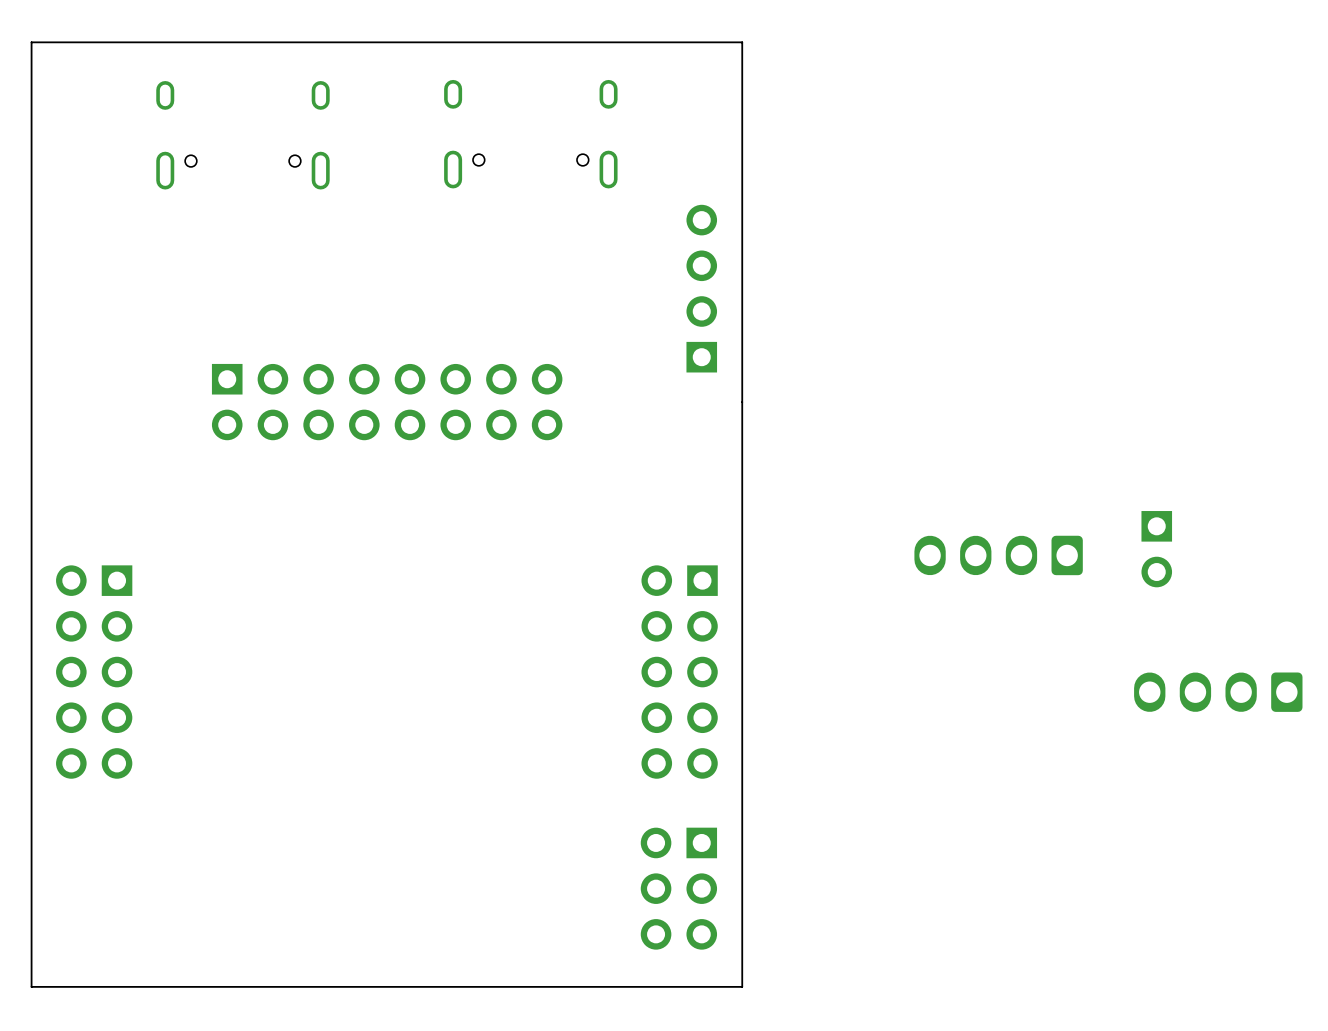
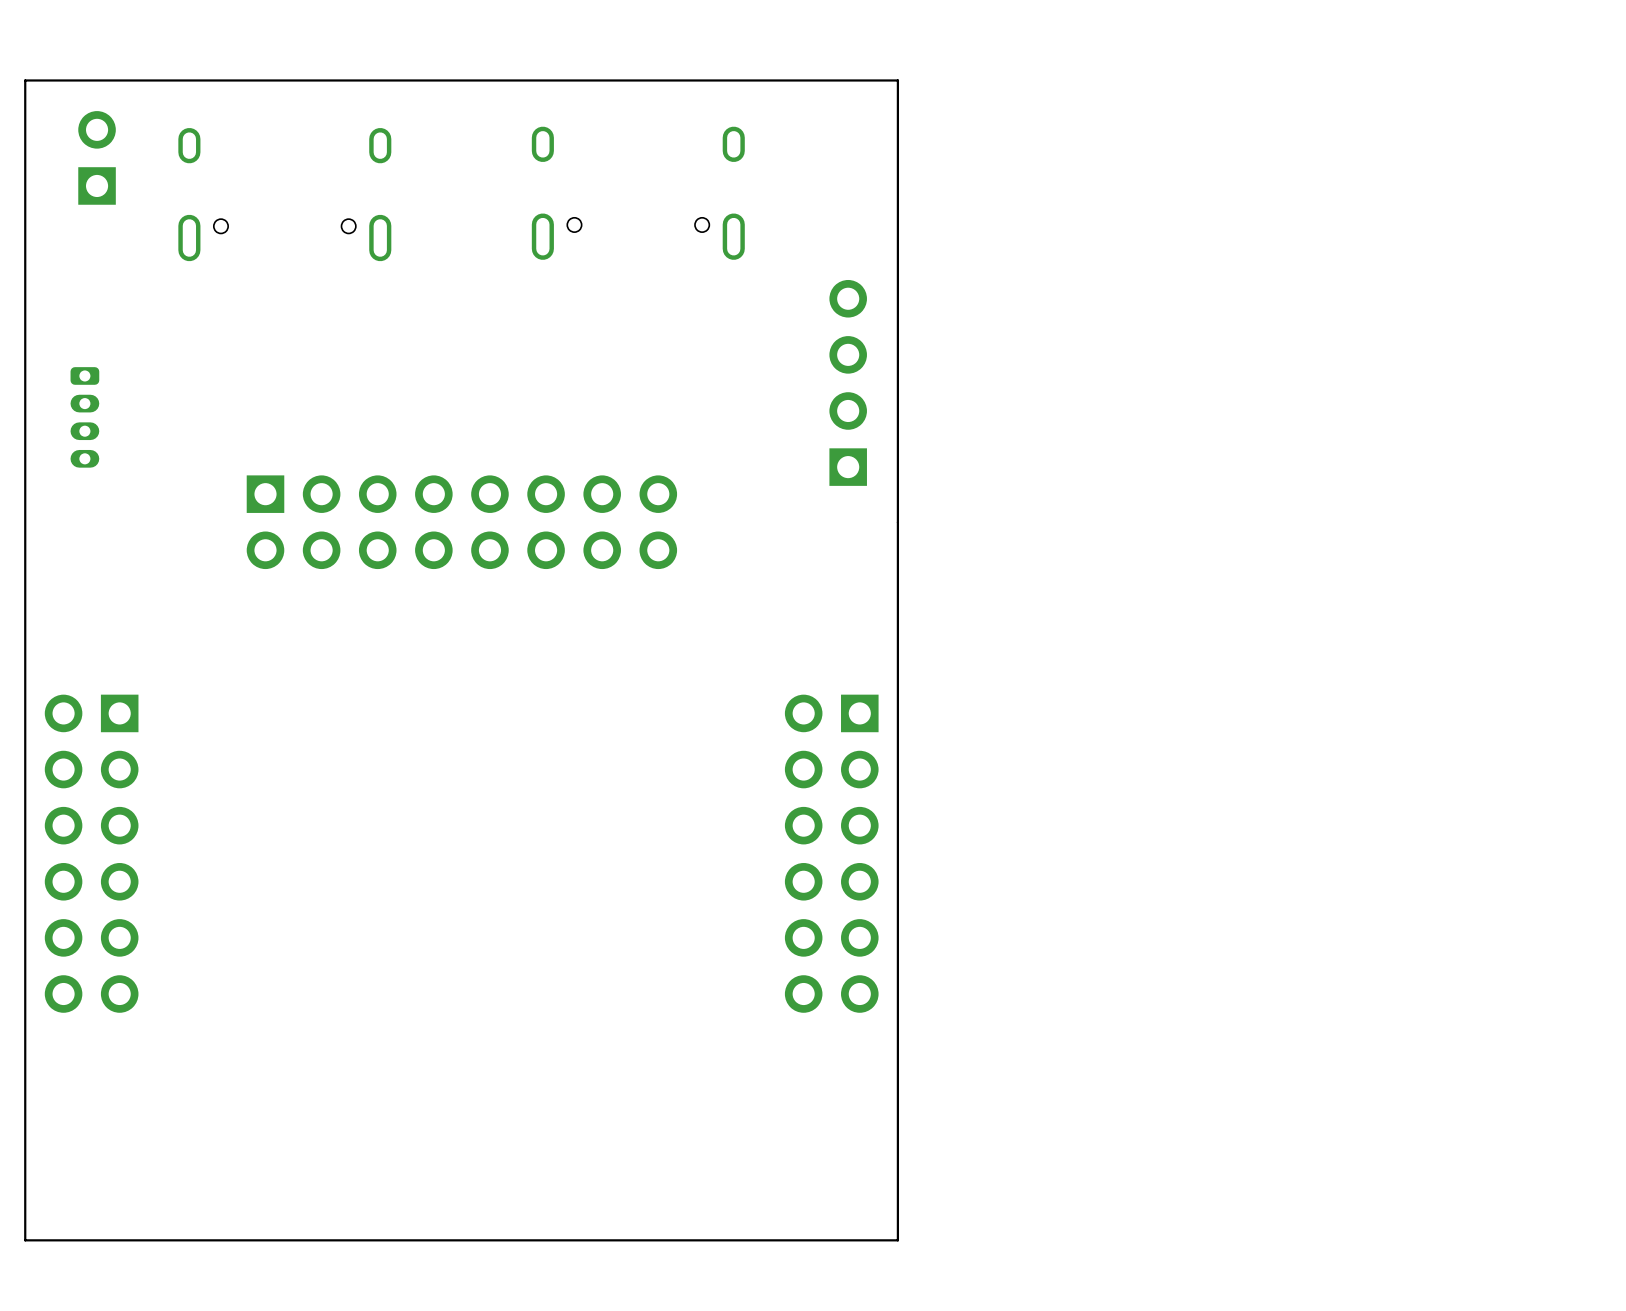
part: none -> (97, 157)
part: none -> (84, 417)
part: (1156, 549) -> none
part: (998, 555) -> none
part footprint: [56, 565, 133, 779] -> [44, 694, 139, 1013]
part footprint: [641, 565, 718, 779] -> [784, 694, 879, 1013]
part: (1218, 692) -> none
part: (678, 888) -> none

